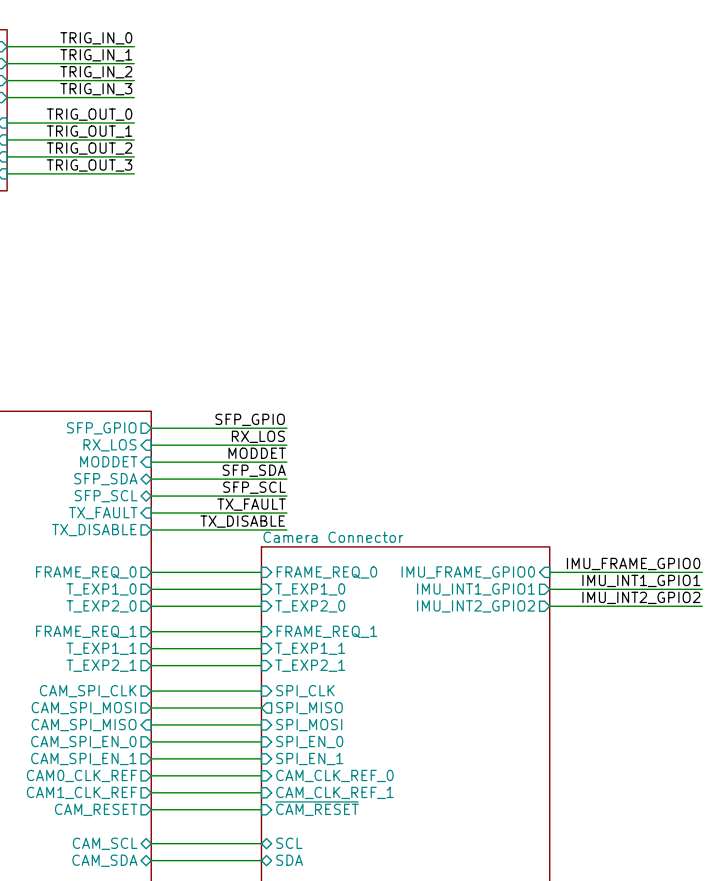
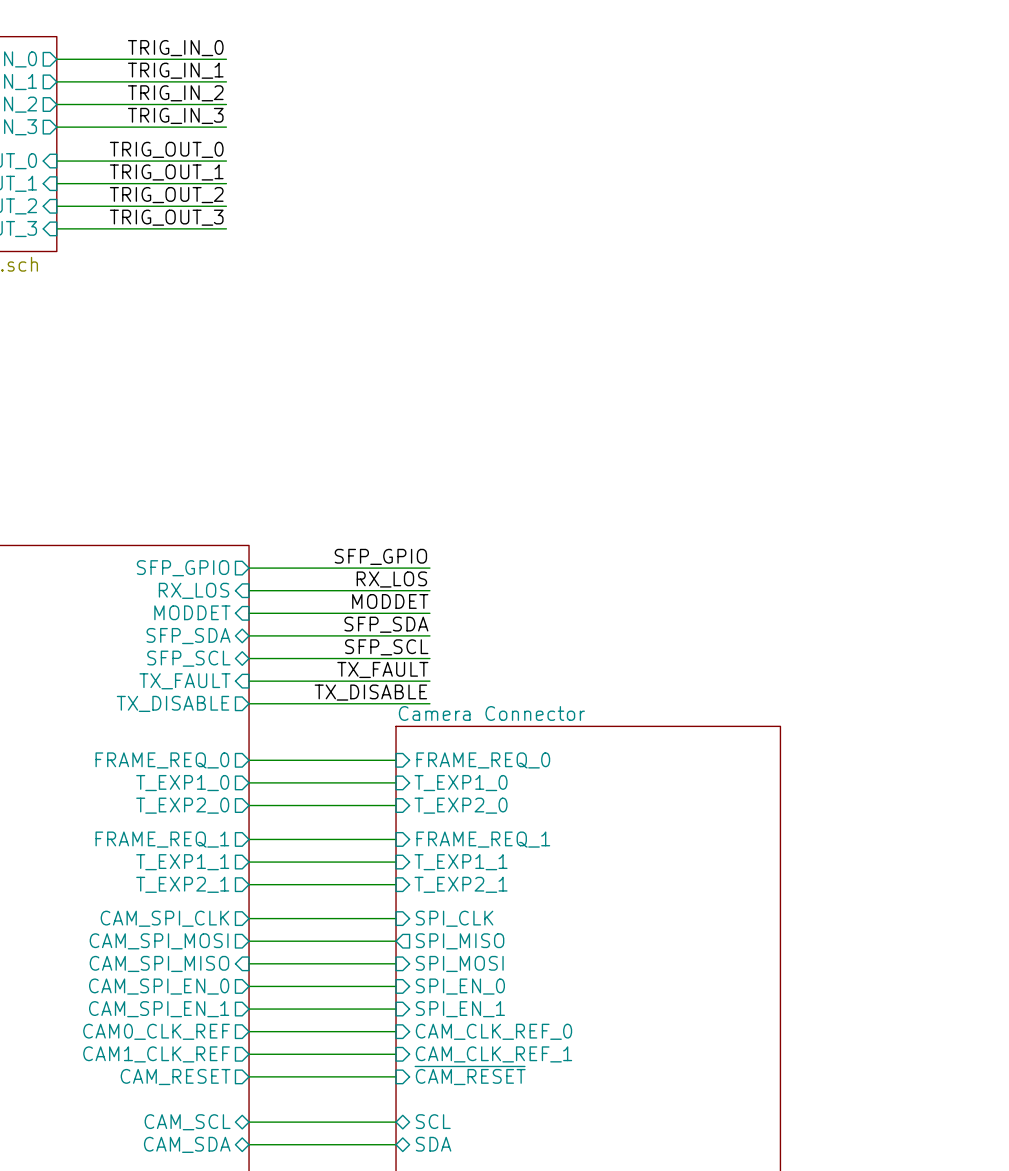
label: IMU_FRAME_GPIO0 (633, 563) -> none
sheet pin: IMU_FRAME_GPIO0 (468, 572) -> none
wire: (549, 572) (702, 572) -> none
label: IMU_INT1_GPIO1 (641, 580) -> none
sheet pin: IMU_INT1_GPIO1 (476, 589) -> none
wire: (549, 589) (702, 589) -> none
label: IMU_INT2_GPIO2 (641, 597) -> none
sheet pin: IMU_INT2_GPIO2 (476, 606) -> none
wire: (549, 606) (702, 606) -> none

